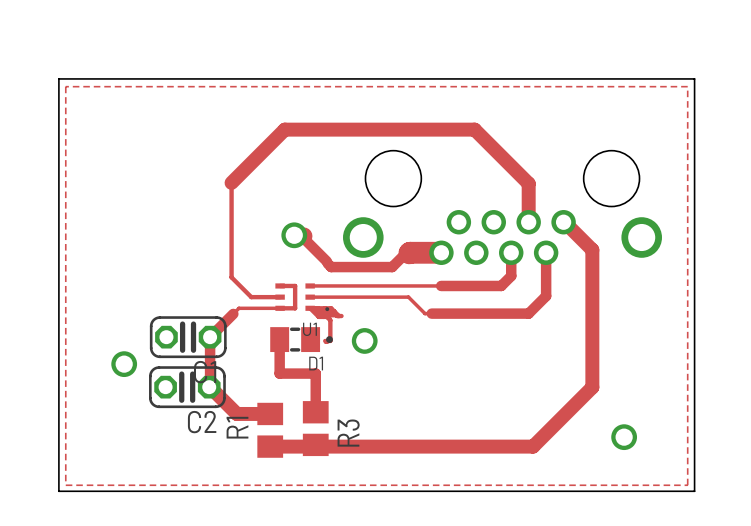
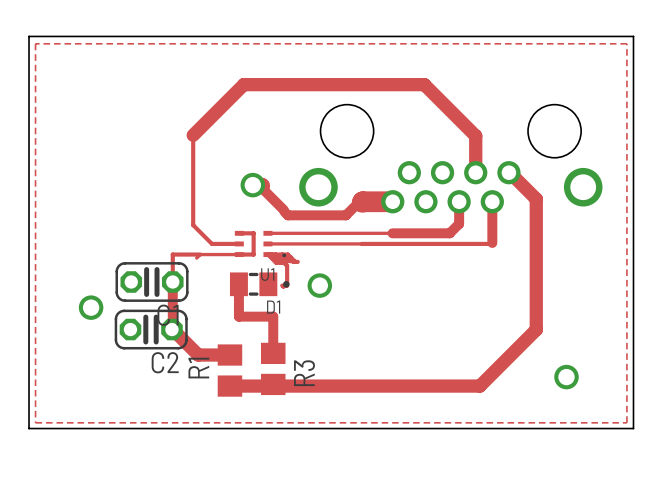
track: (546, 296) (528, 313) (425, 313) (408, 297) -> (492, 242) (361, 243)
track: (233, 313) (210, 337) -> (200, 254) (172, 254) (172, 282)

